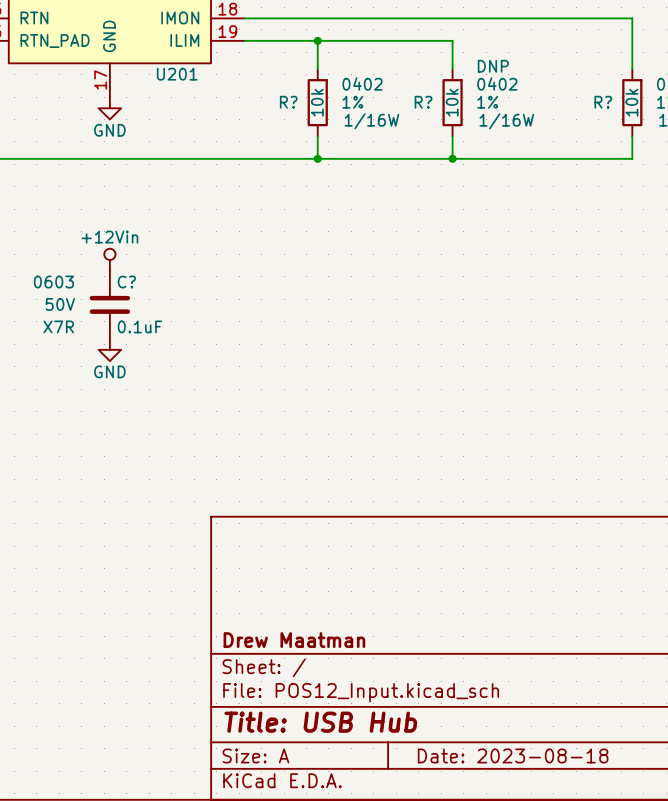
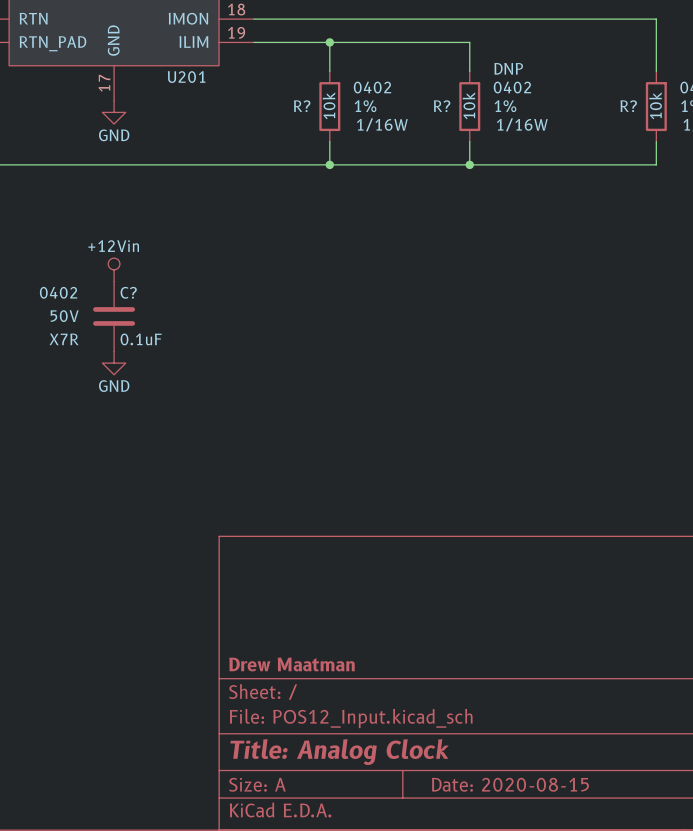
C? text: 0603 (53, 282) -> 0402 (58, 292)
title block: Title: USB Hub (320, 722) -> Title: Analog Clock (339, 752)
title block: Date: 2023-08-18 (513, 755) -> Date: 2020-08-15 (510, 784)

